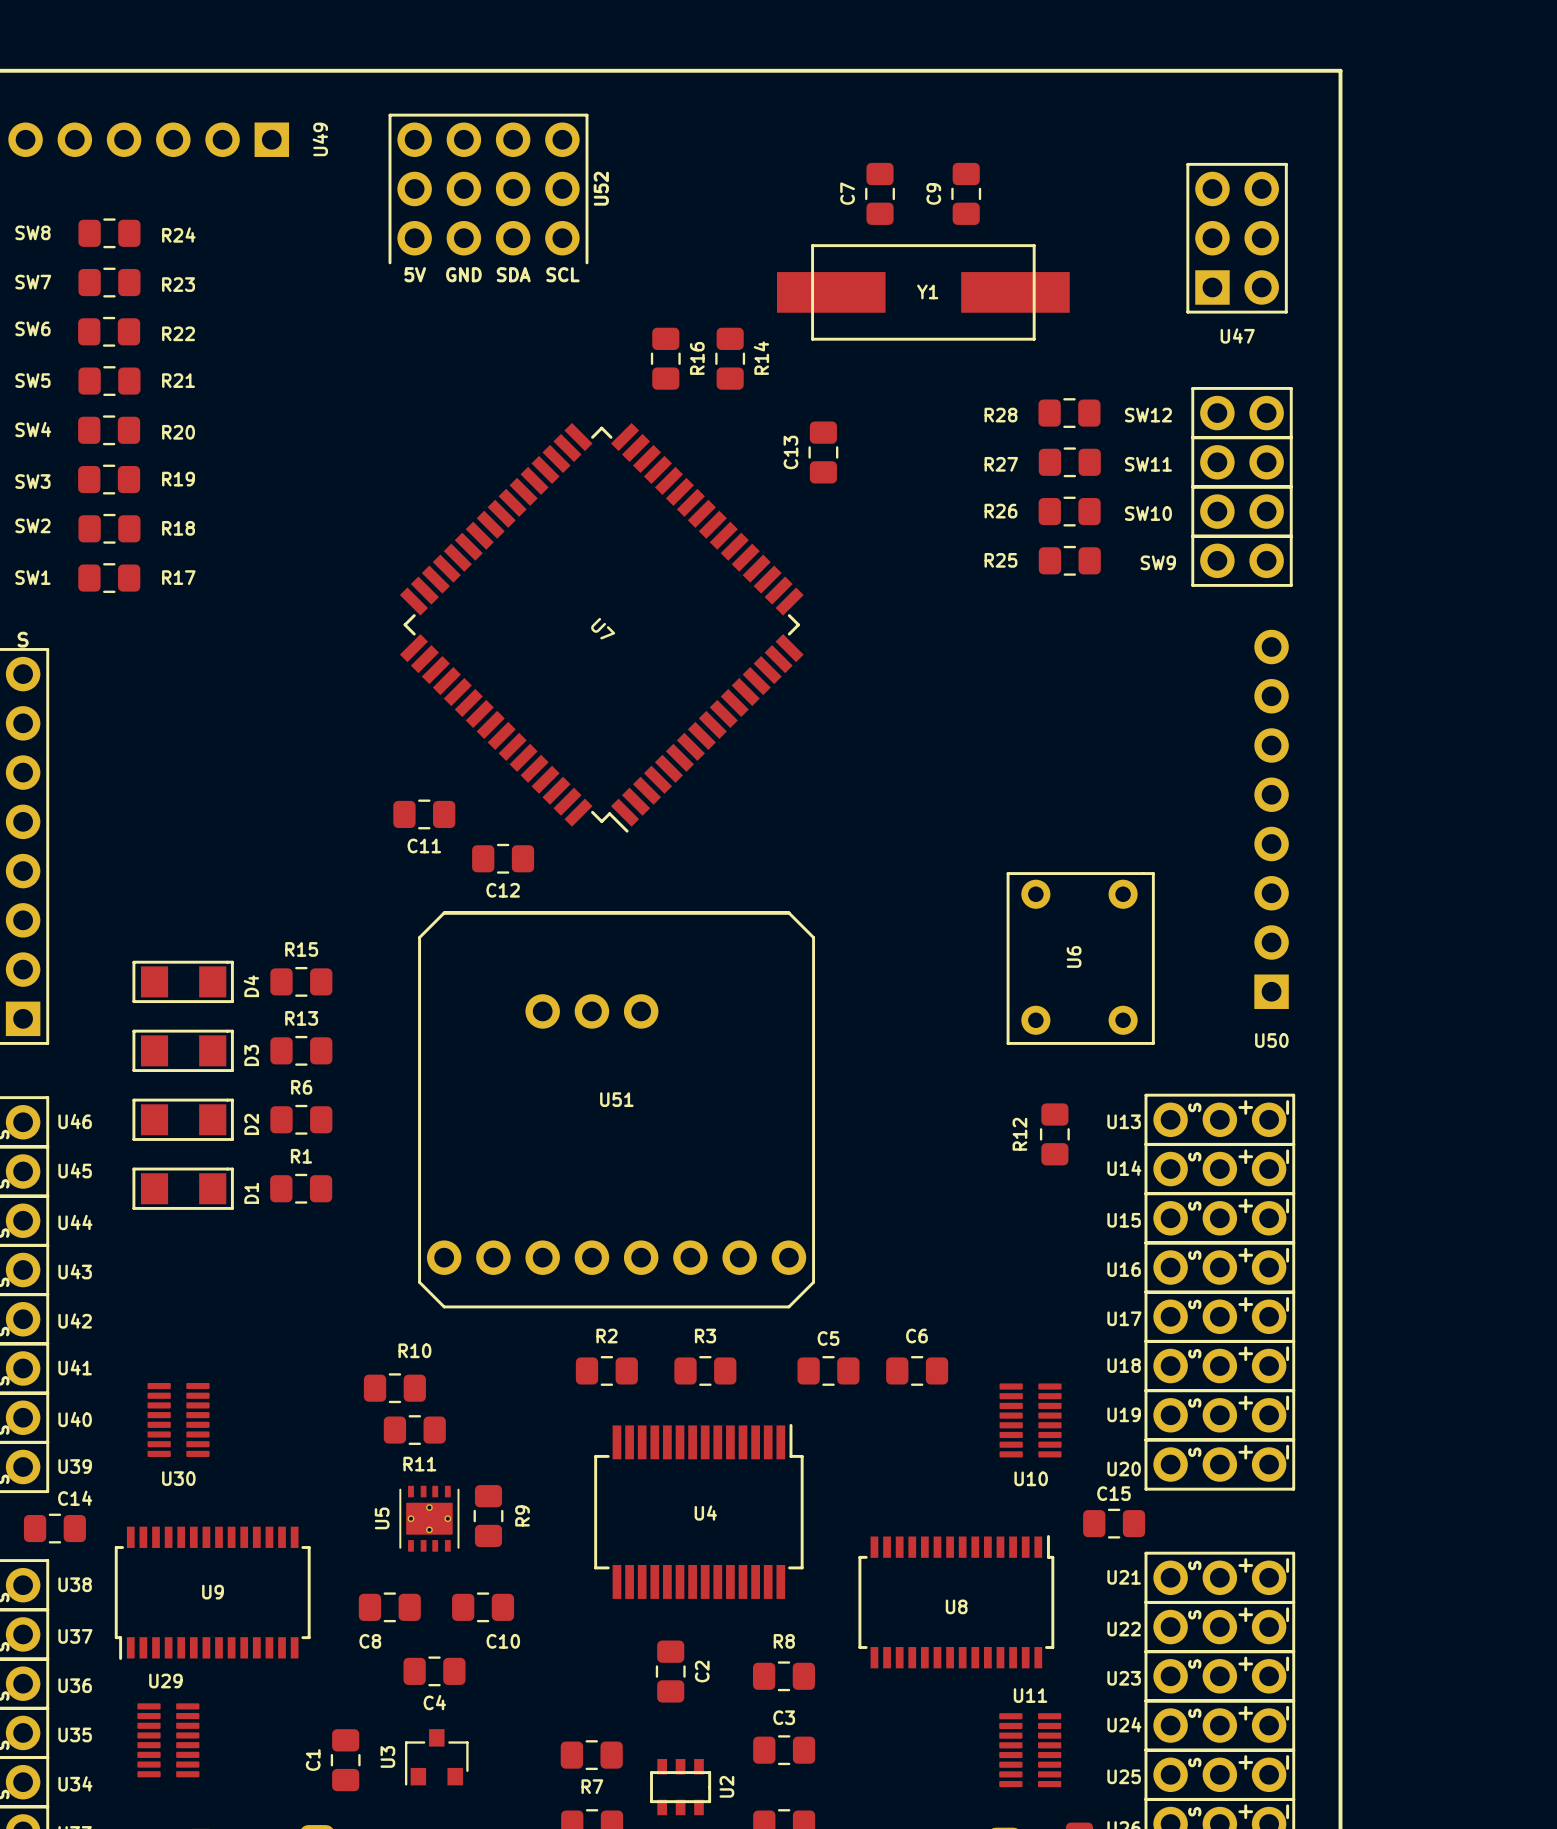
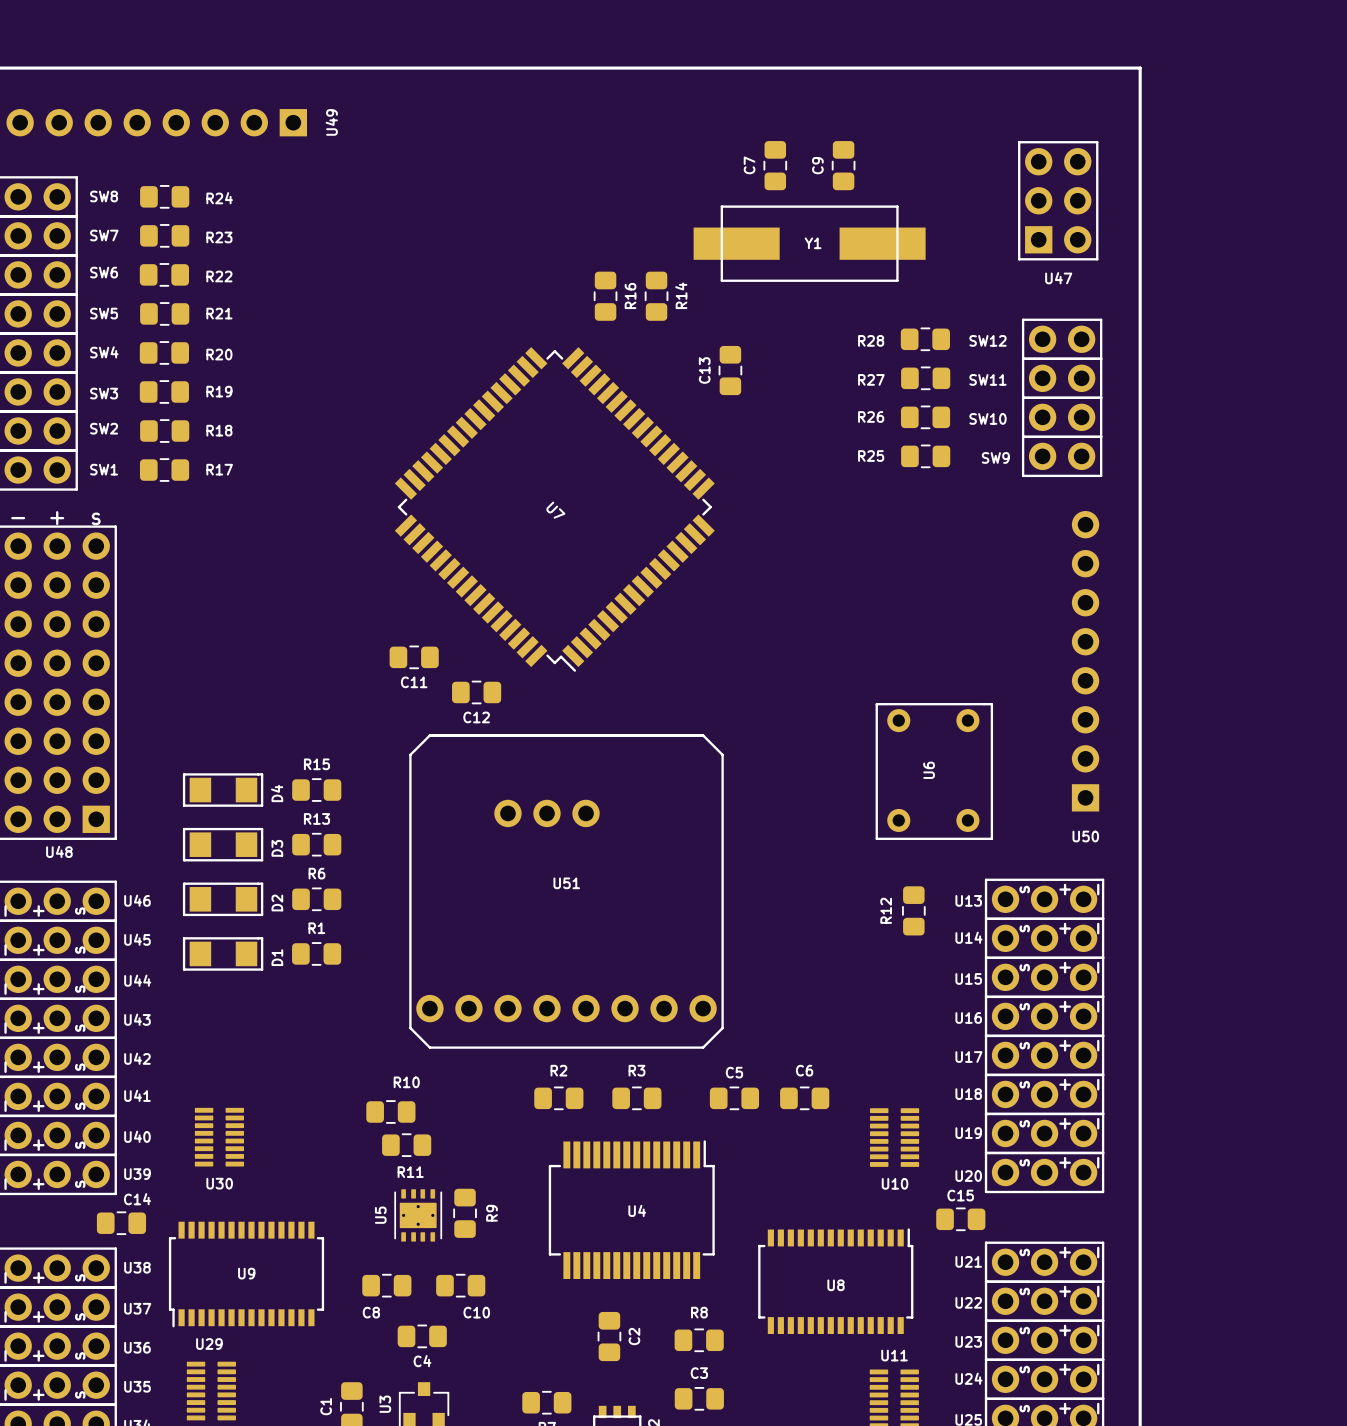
U52: (488, 188) -> none

